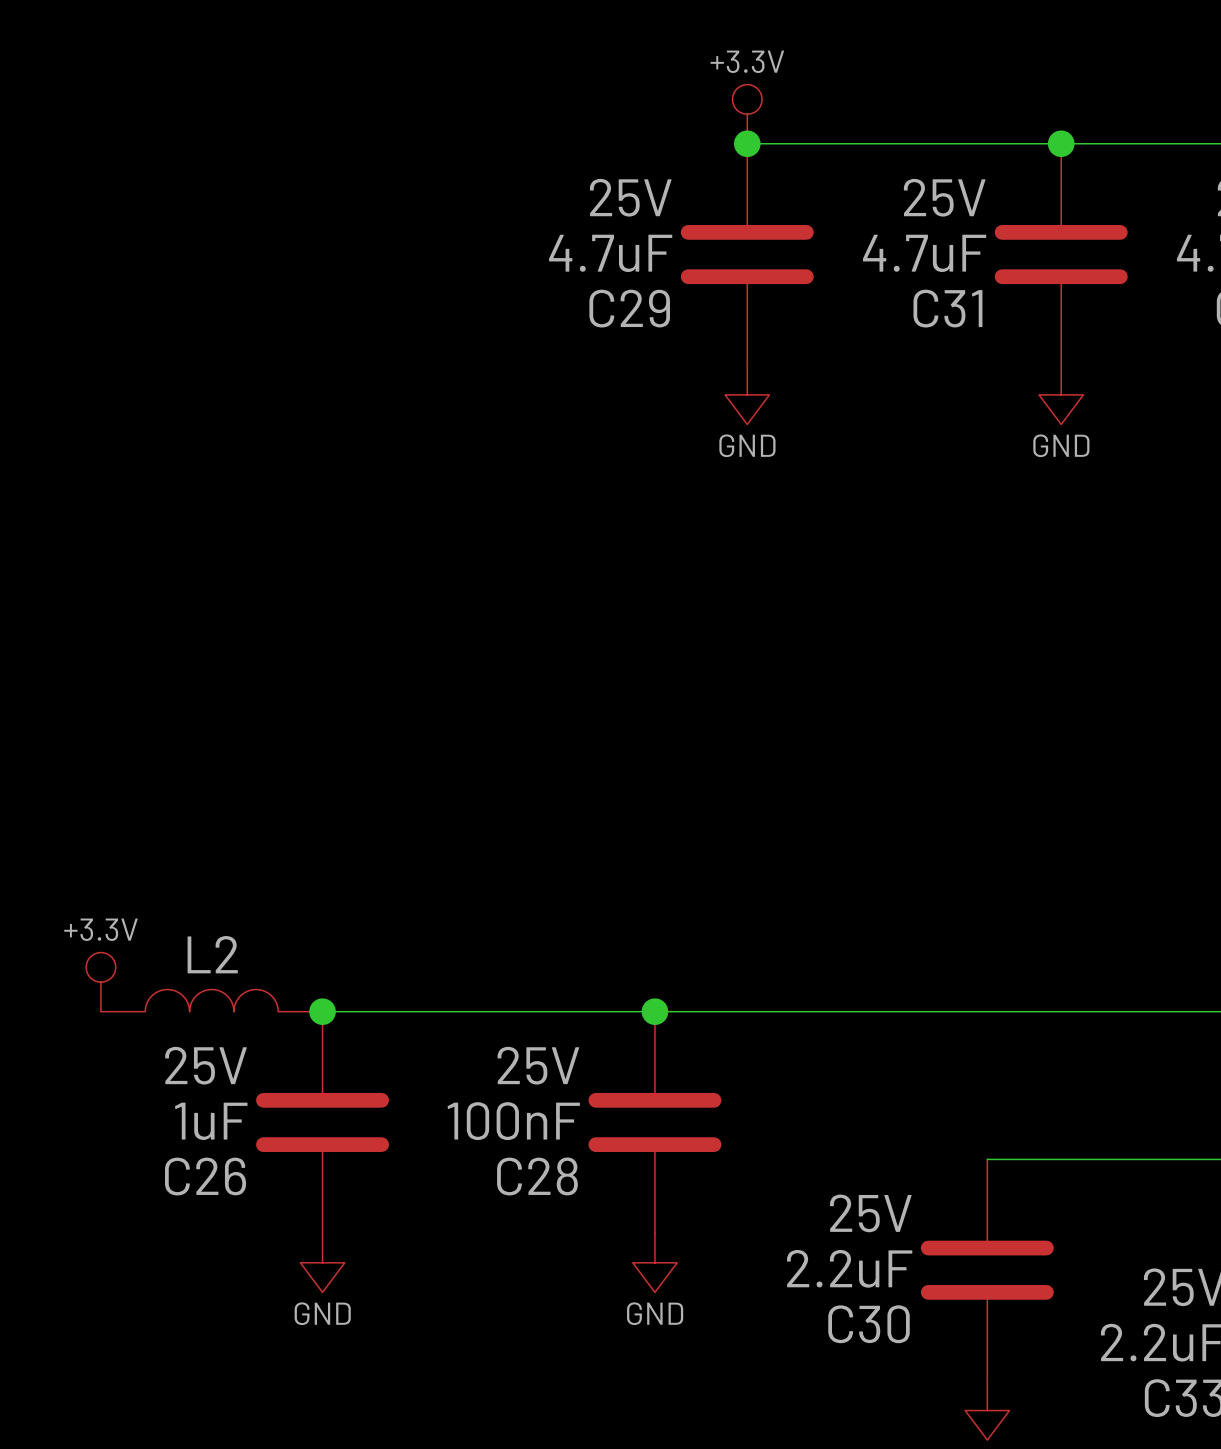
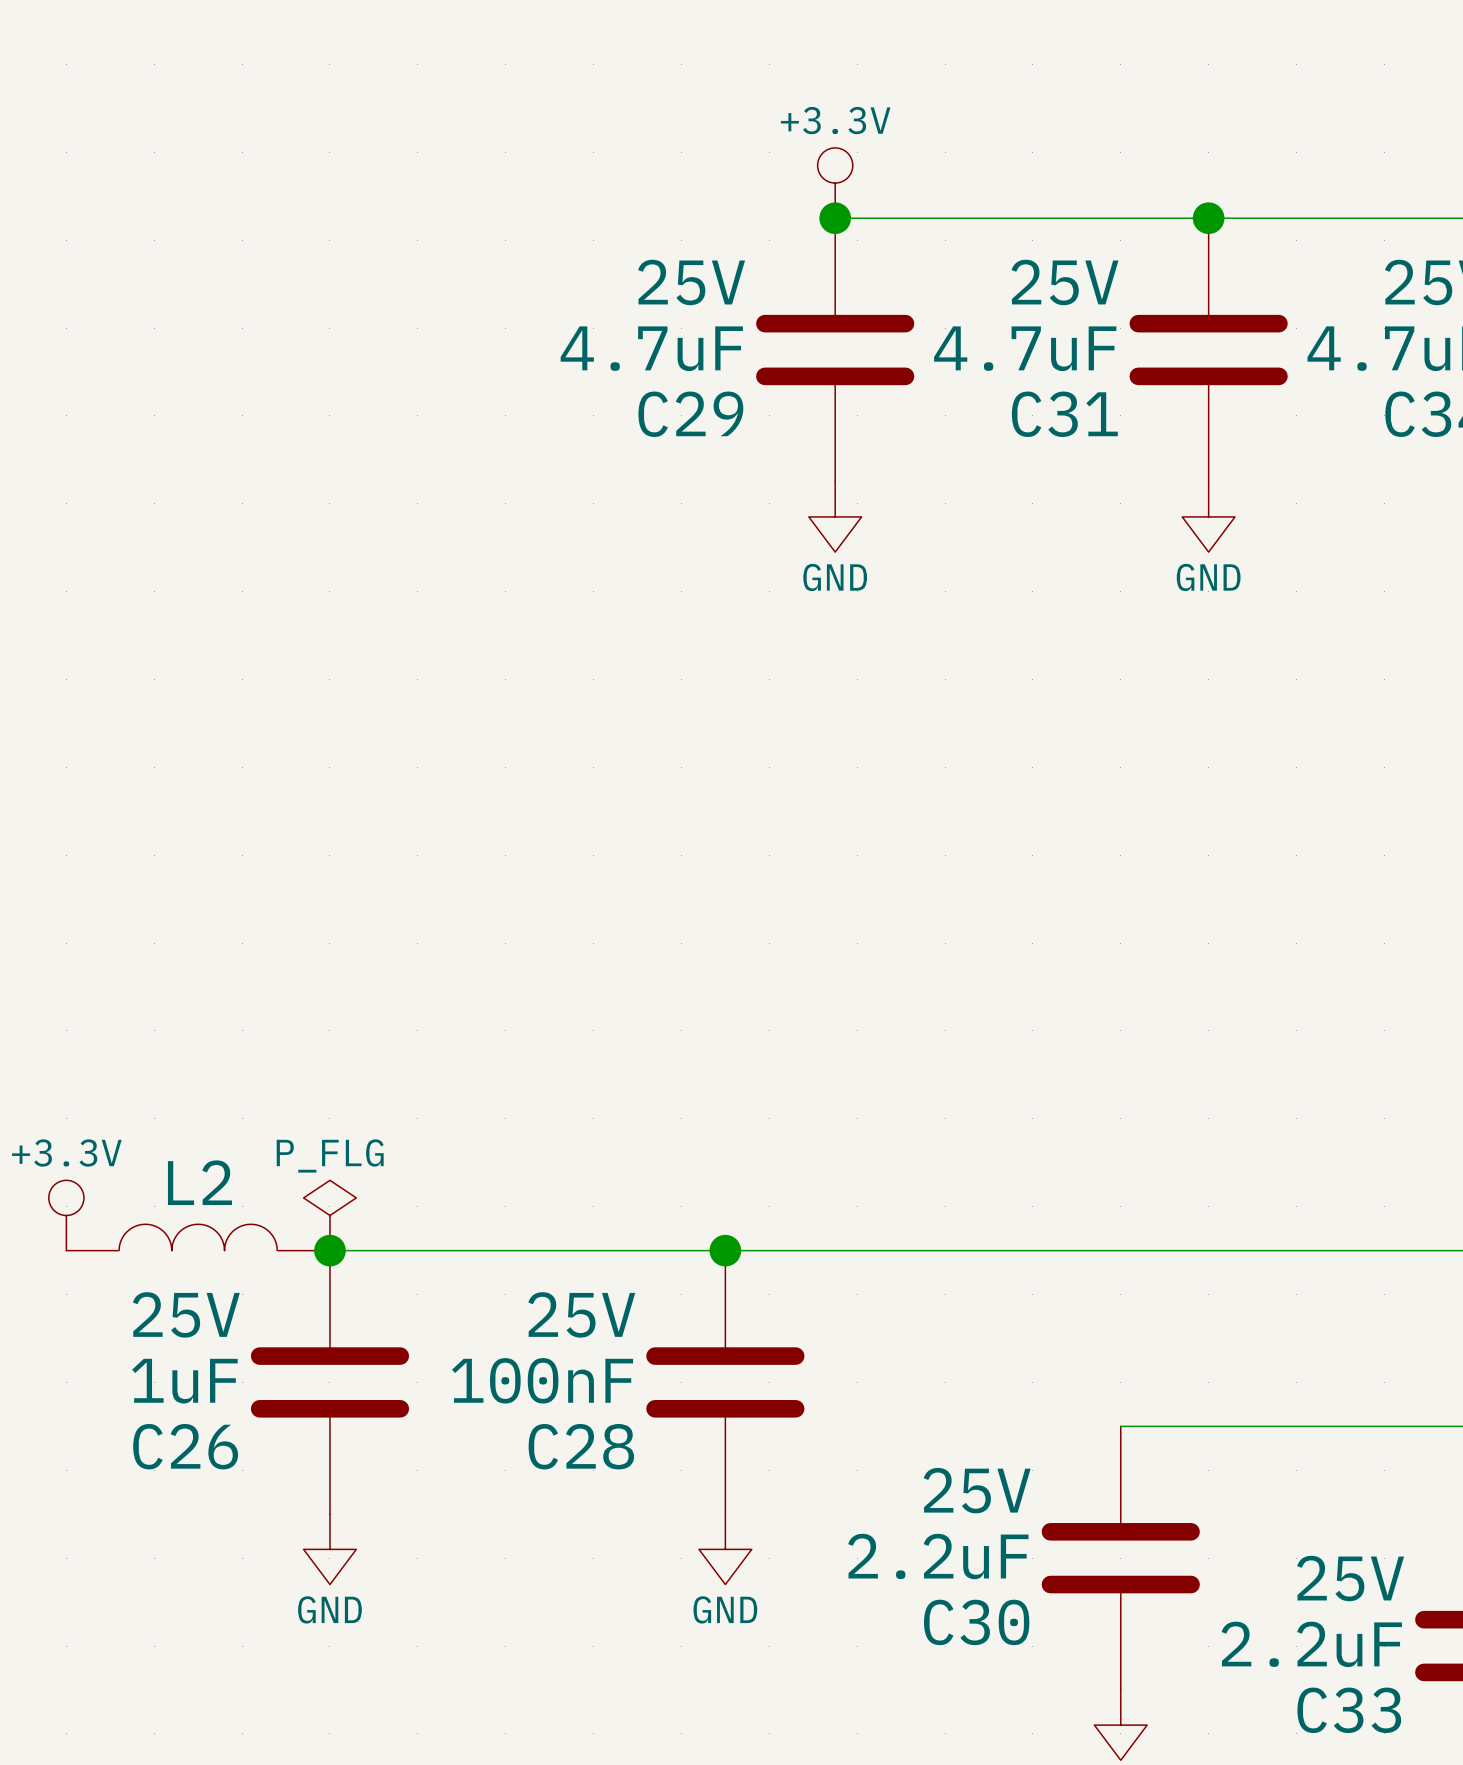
power symbol: none -> P_FLG (329, 1215)

